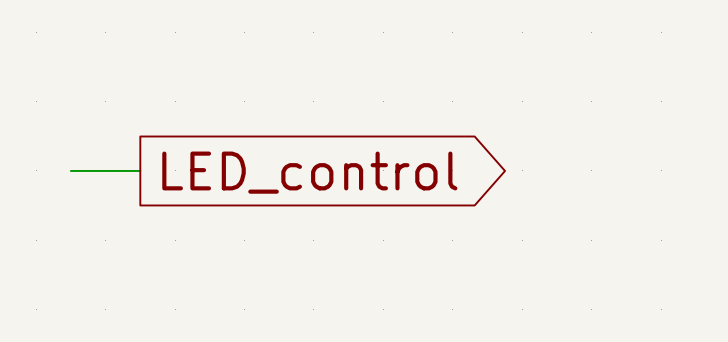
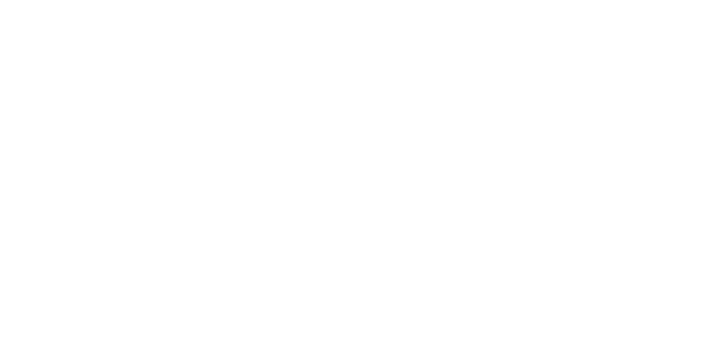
wire: (70, 170) (140, 170) -> none
global label: LED_control (309, 172) -> none

